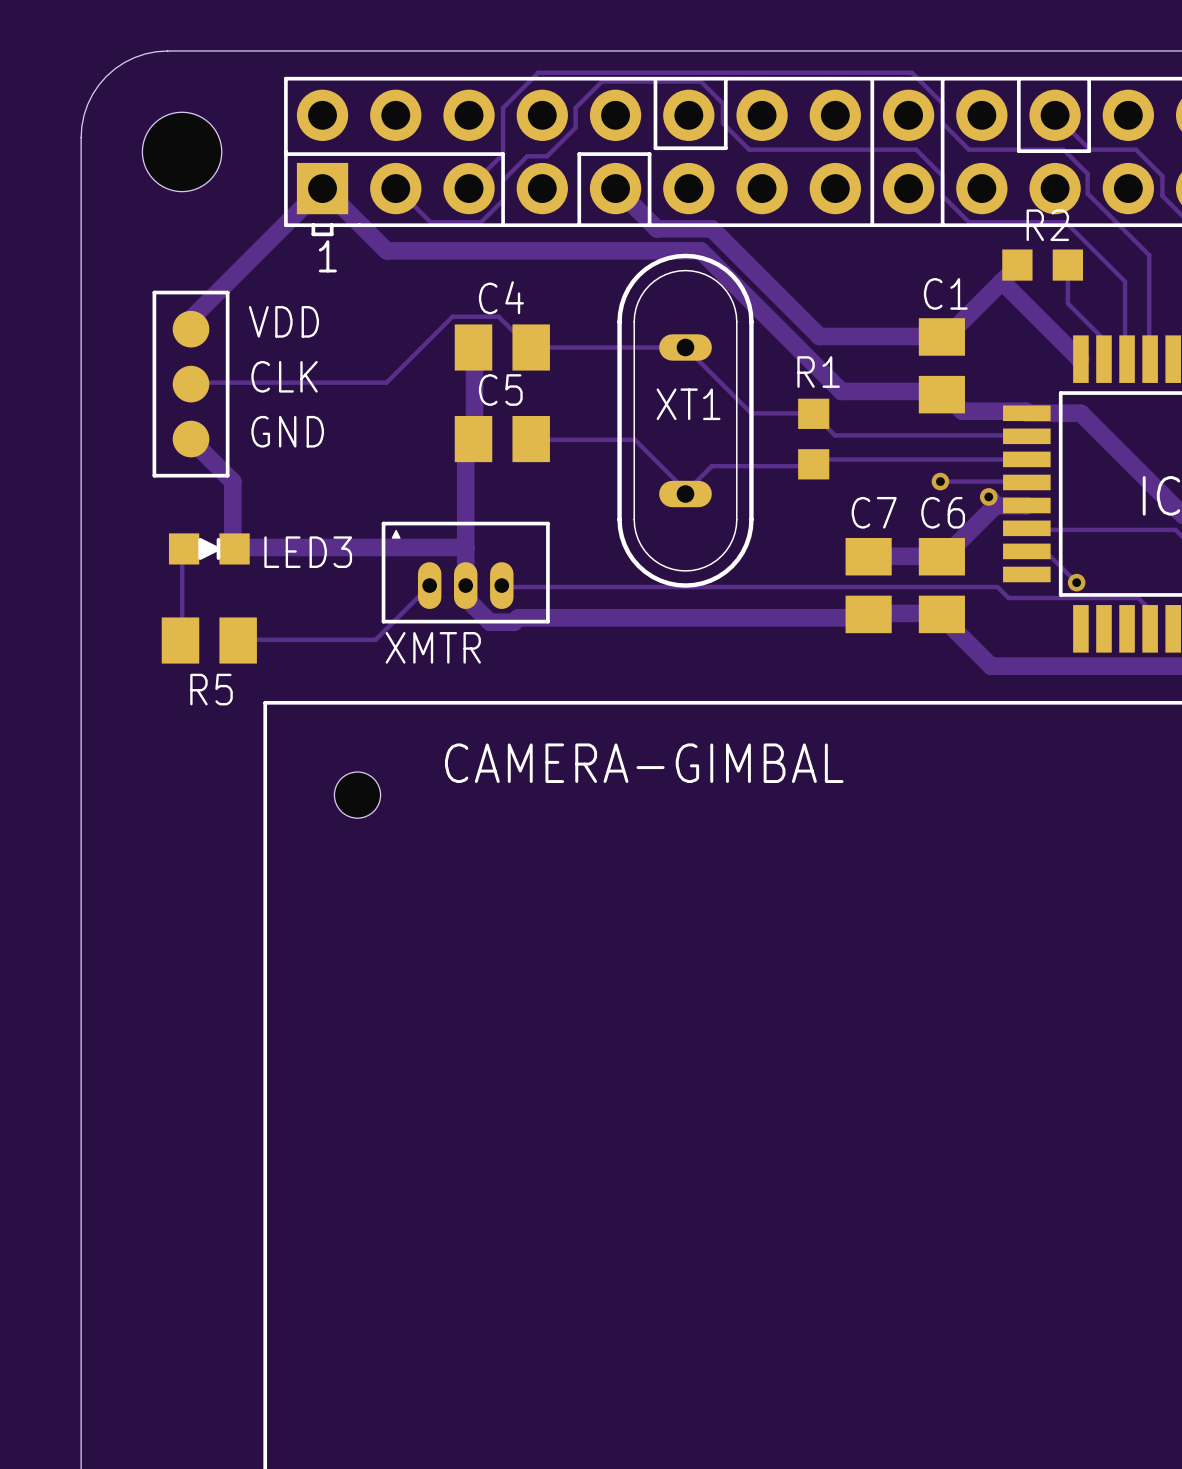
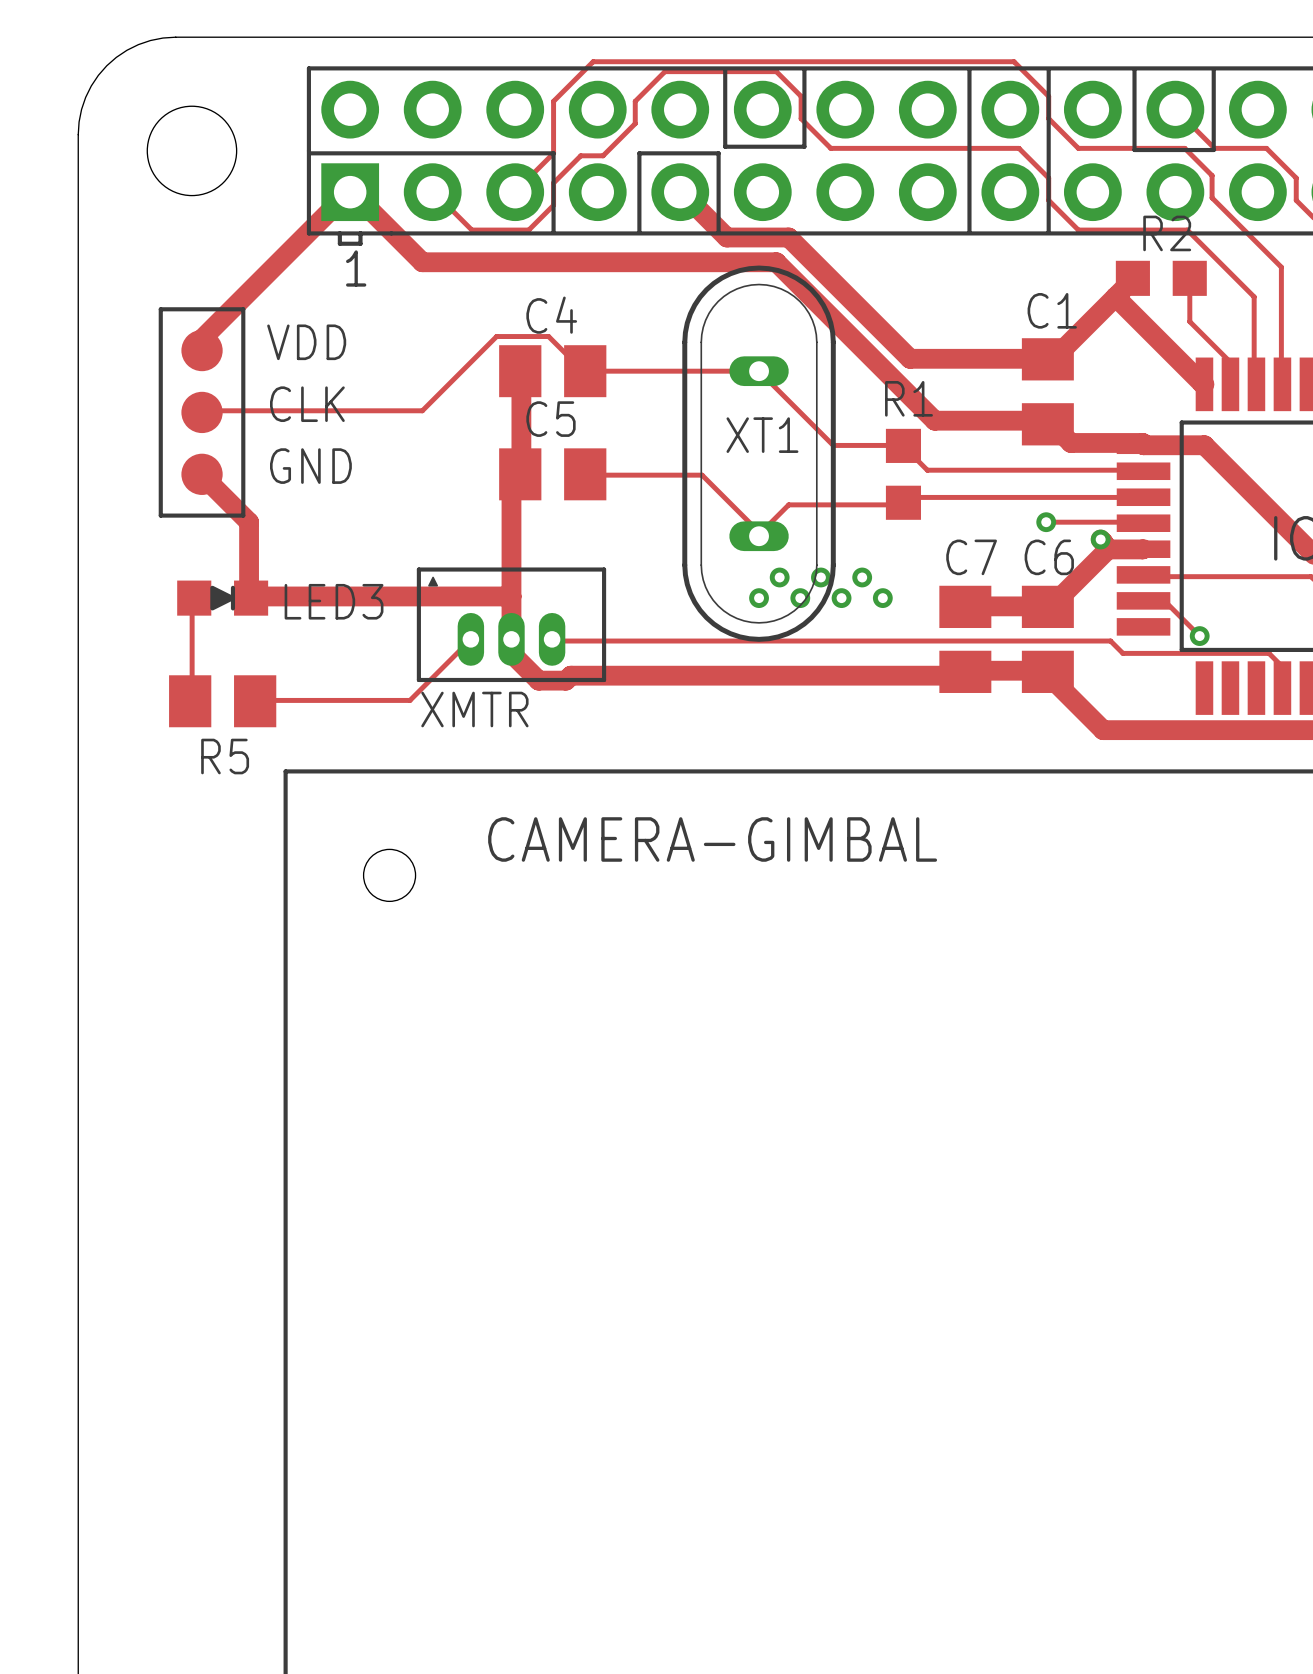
via: none -> (779, 577)
via: none -> (820, 577)
via: none -> (862, 577)
via: none -> (759, 598)
via: none -> (800, 598)
via: none -> (841, 598)
via: none -> (882, 598)

